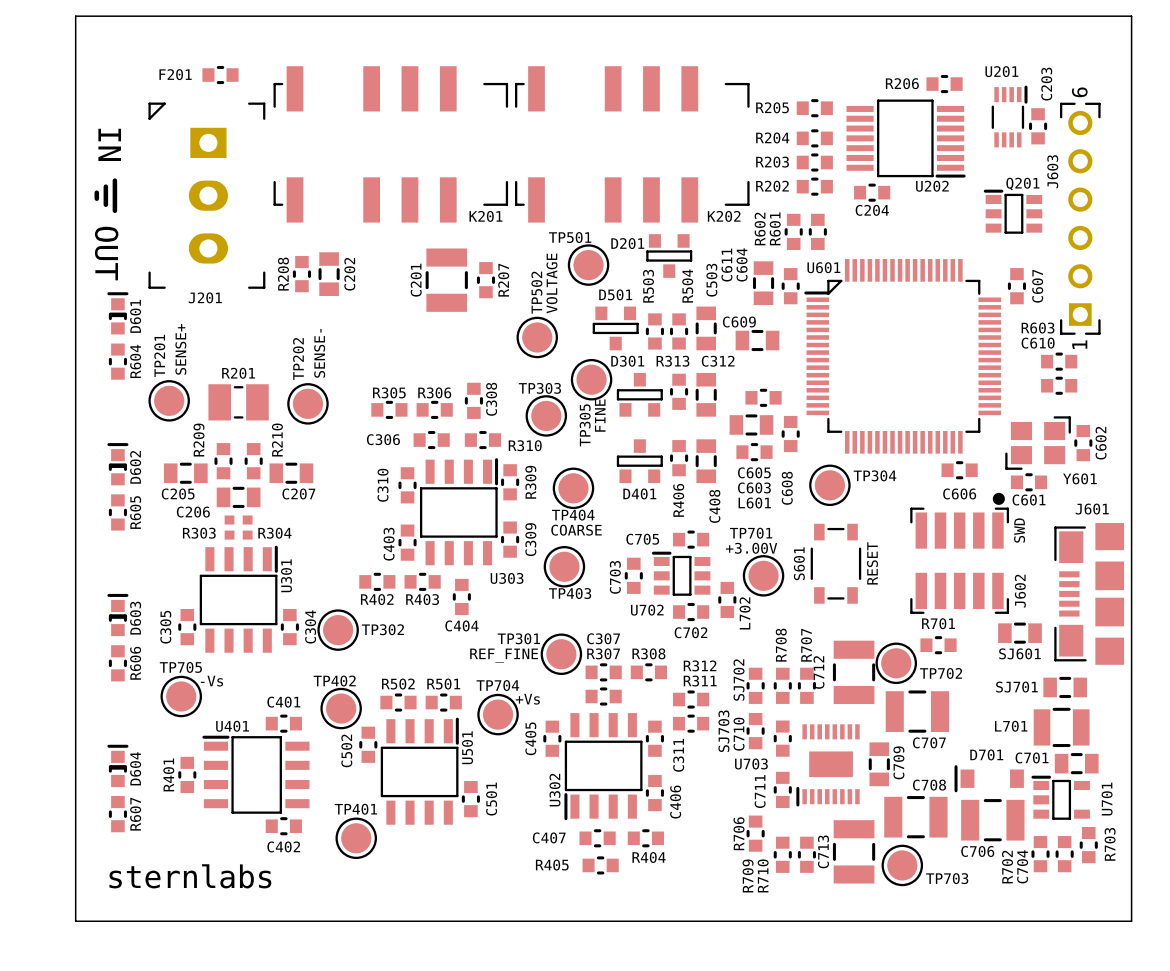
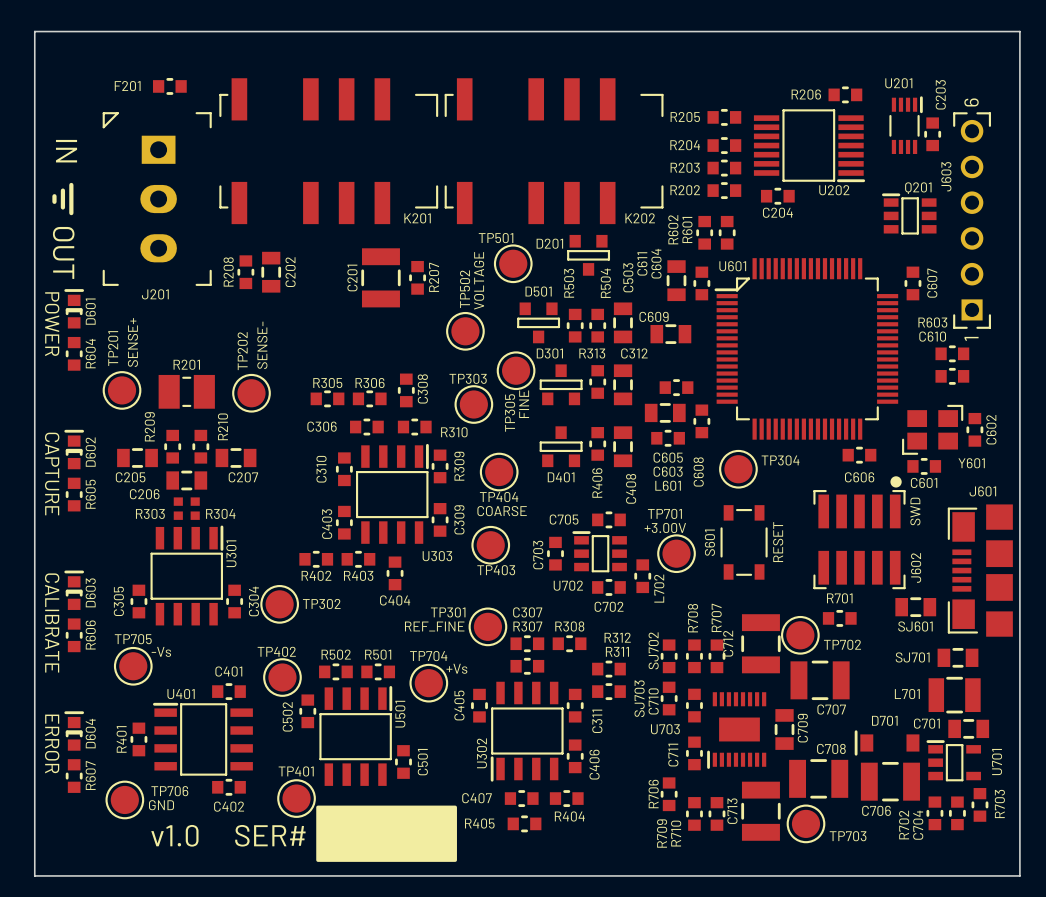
text: none -> POWER (52, 324)
text: none -> CAPTURE (52, 474)
text: none -> CALIBRATE (52, 622)
text: none -> ERROR (52, 743)
TP706: none -> GND (124, 799)
drawing: none -> [316, 805, 457, 862]
text: sternlabs (190, 876) -> none
text: none -> v1.0 (174, 835)
text: none -> SER# (270, 835)

